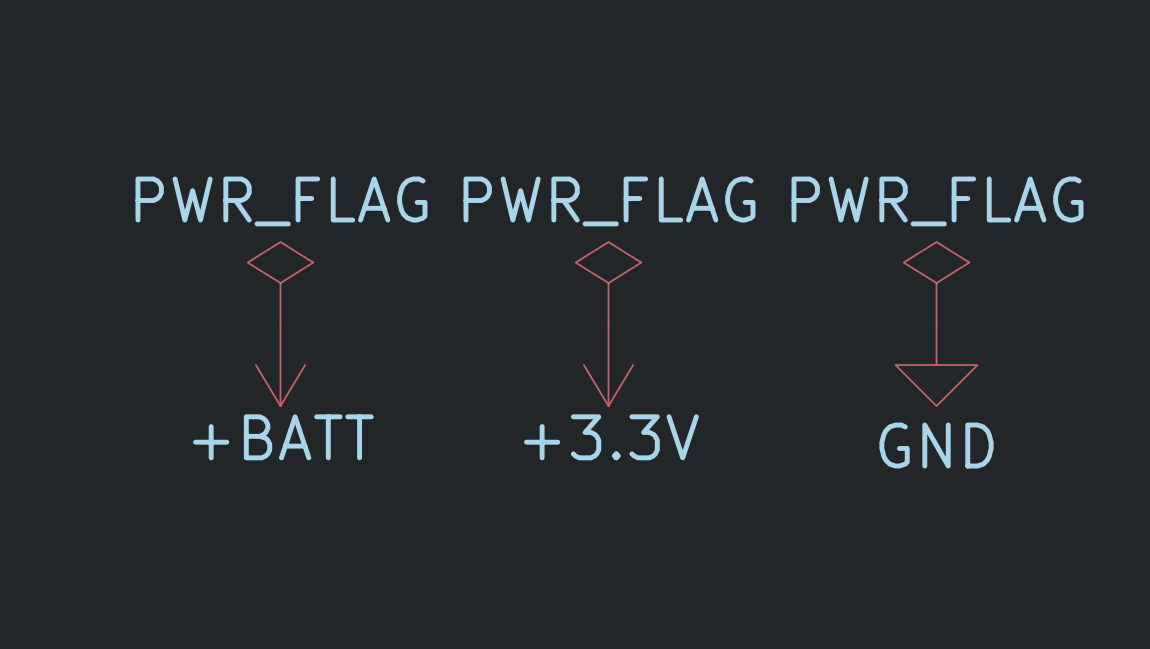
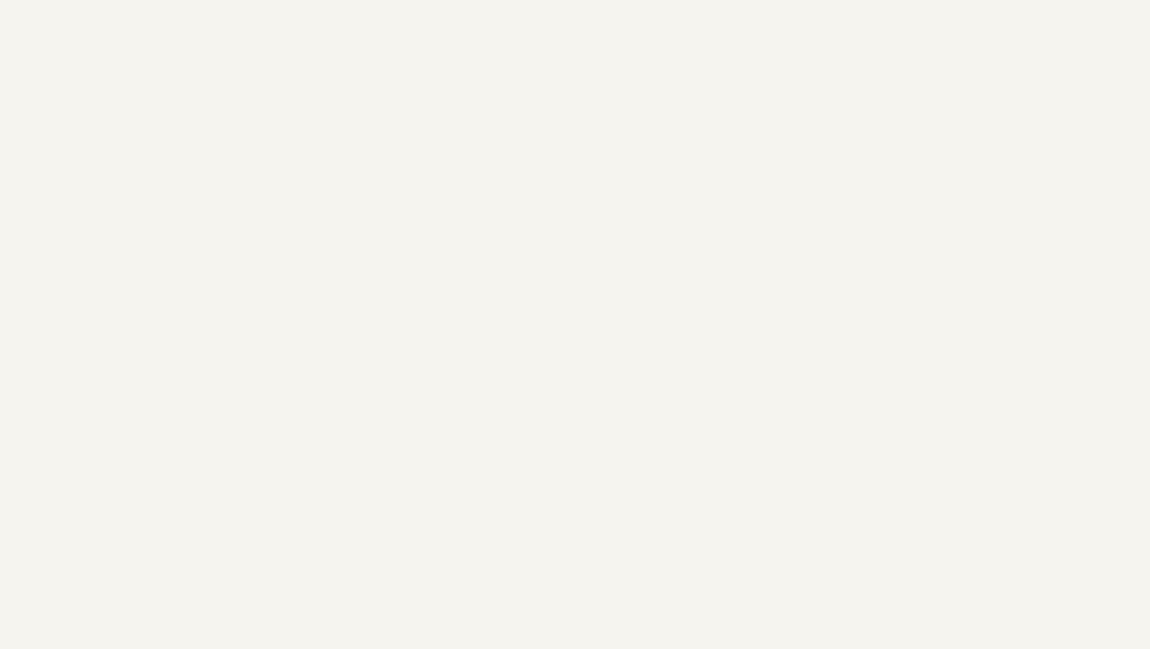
power symbol: PWR_FLAG (280, 283) -> none
power symbol: PWR_FLAG (608, 283) -> none
power symbol: PWR_FLAG (936, 283) -> none
power symbol: +BATT (280, 365) -> none
power symbol: +3.3V (608, 365) -> none
power symbol: GND (936, 365) -> none

